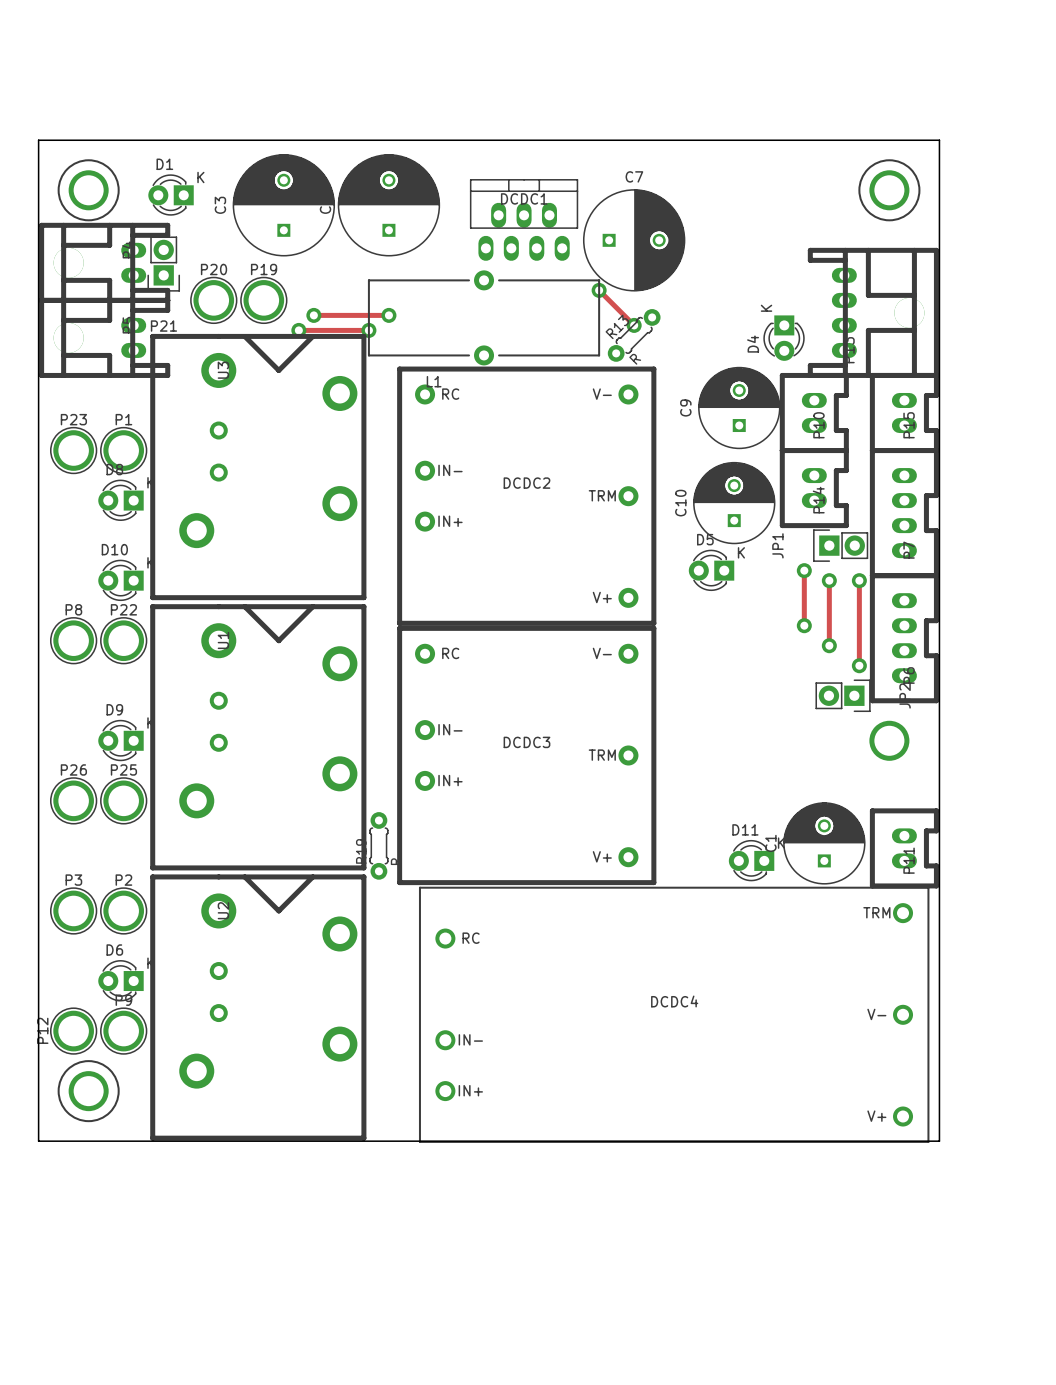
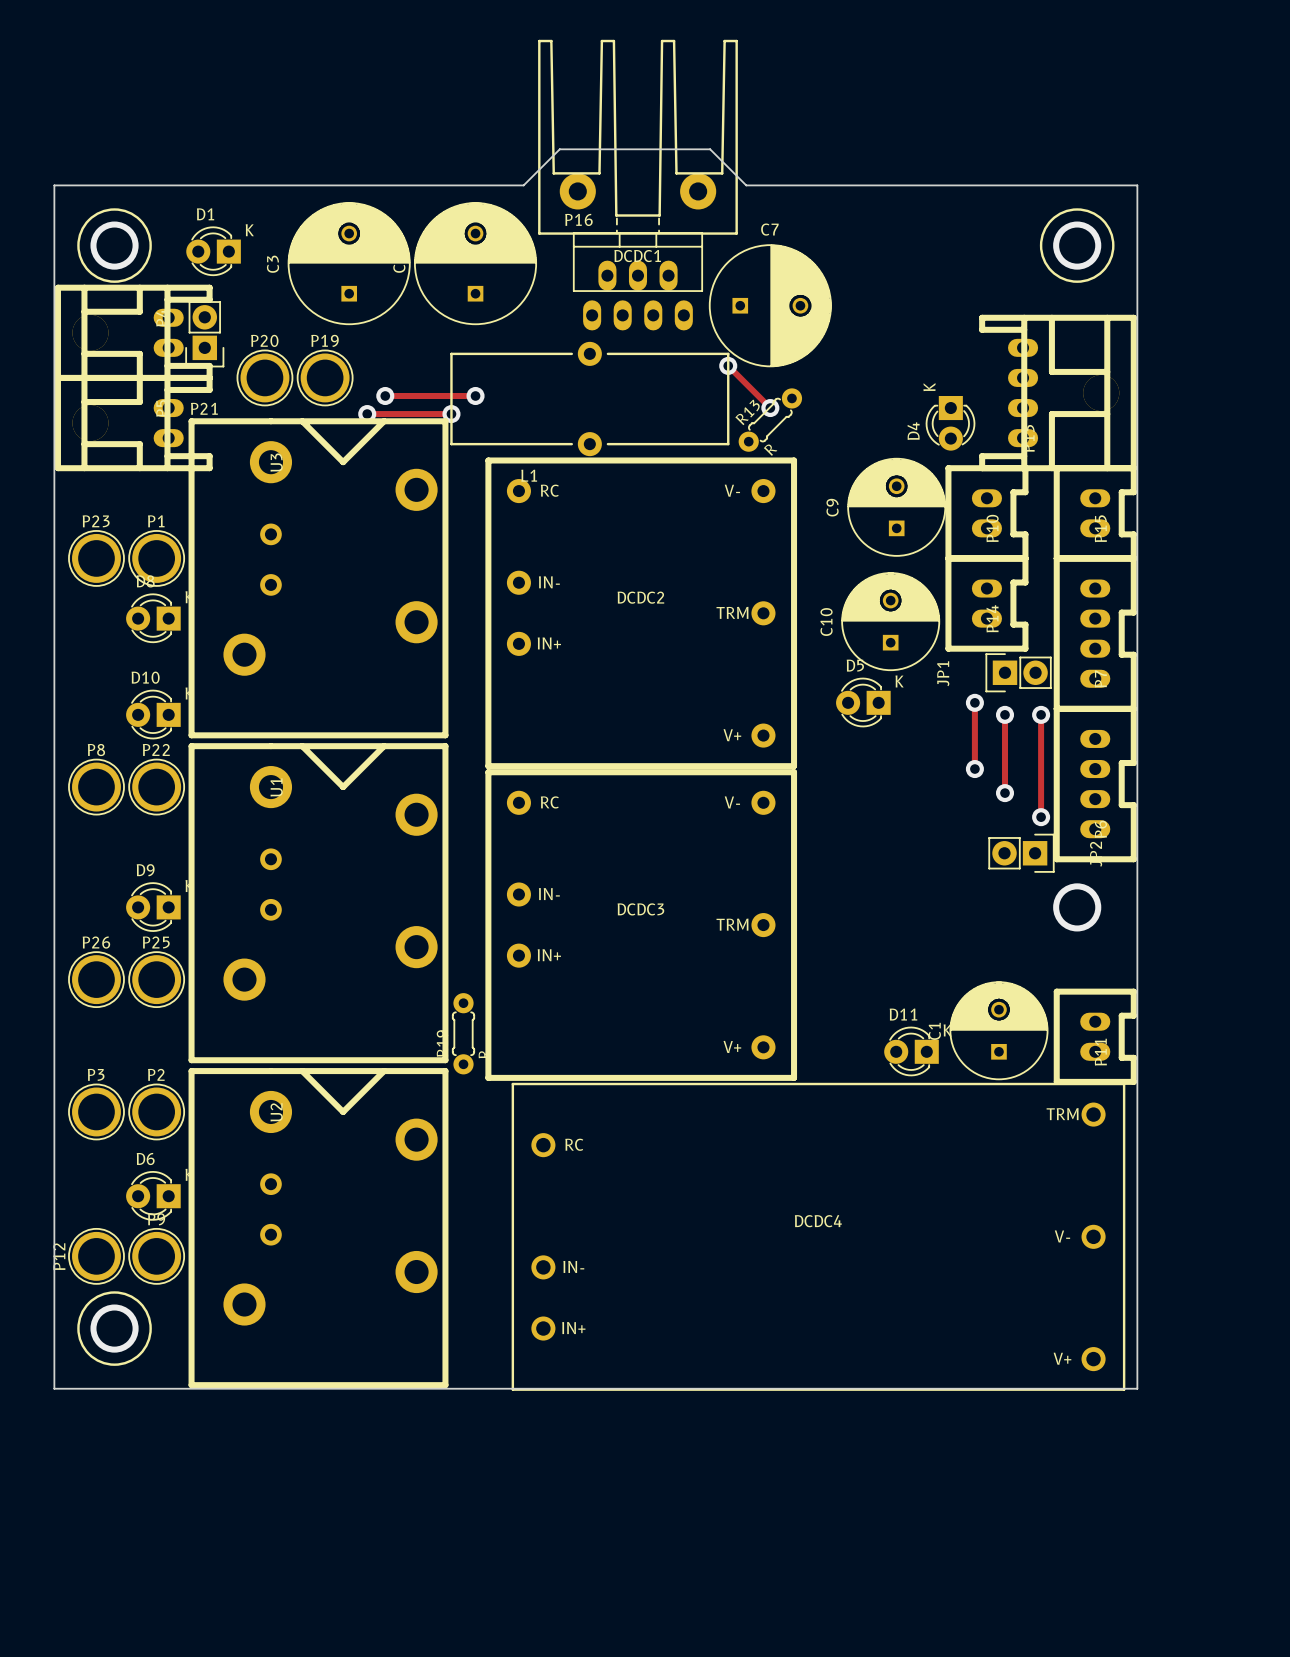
P16: none -> (637, 137)
board edge: (428, 140) (614, 140) -> (523, 185) (559, 149) (710, 149) (746, 185)

